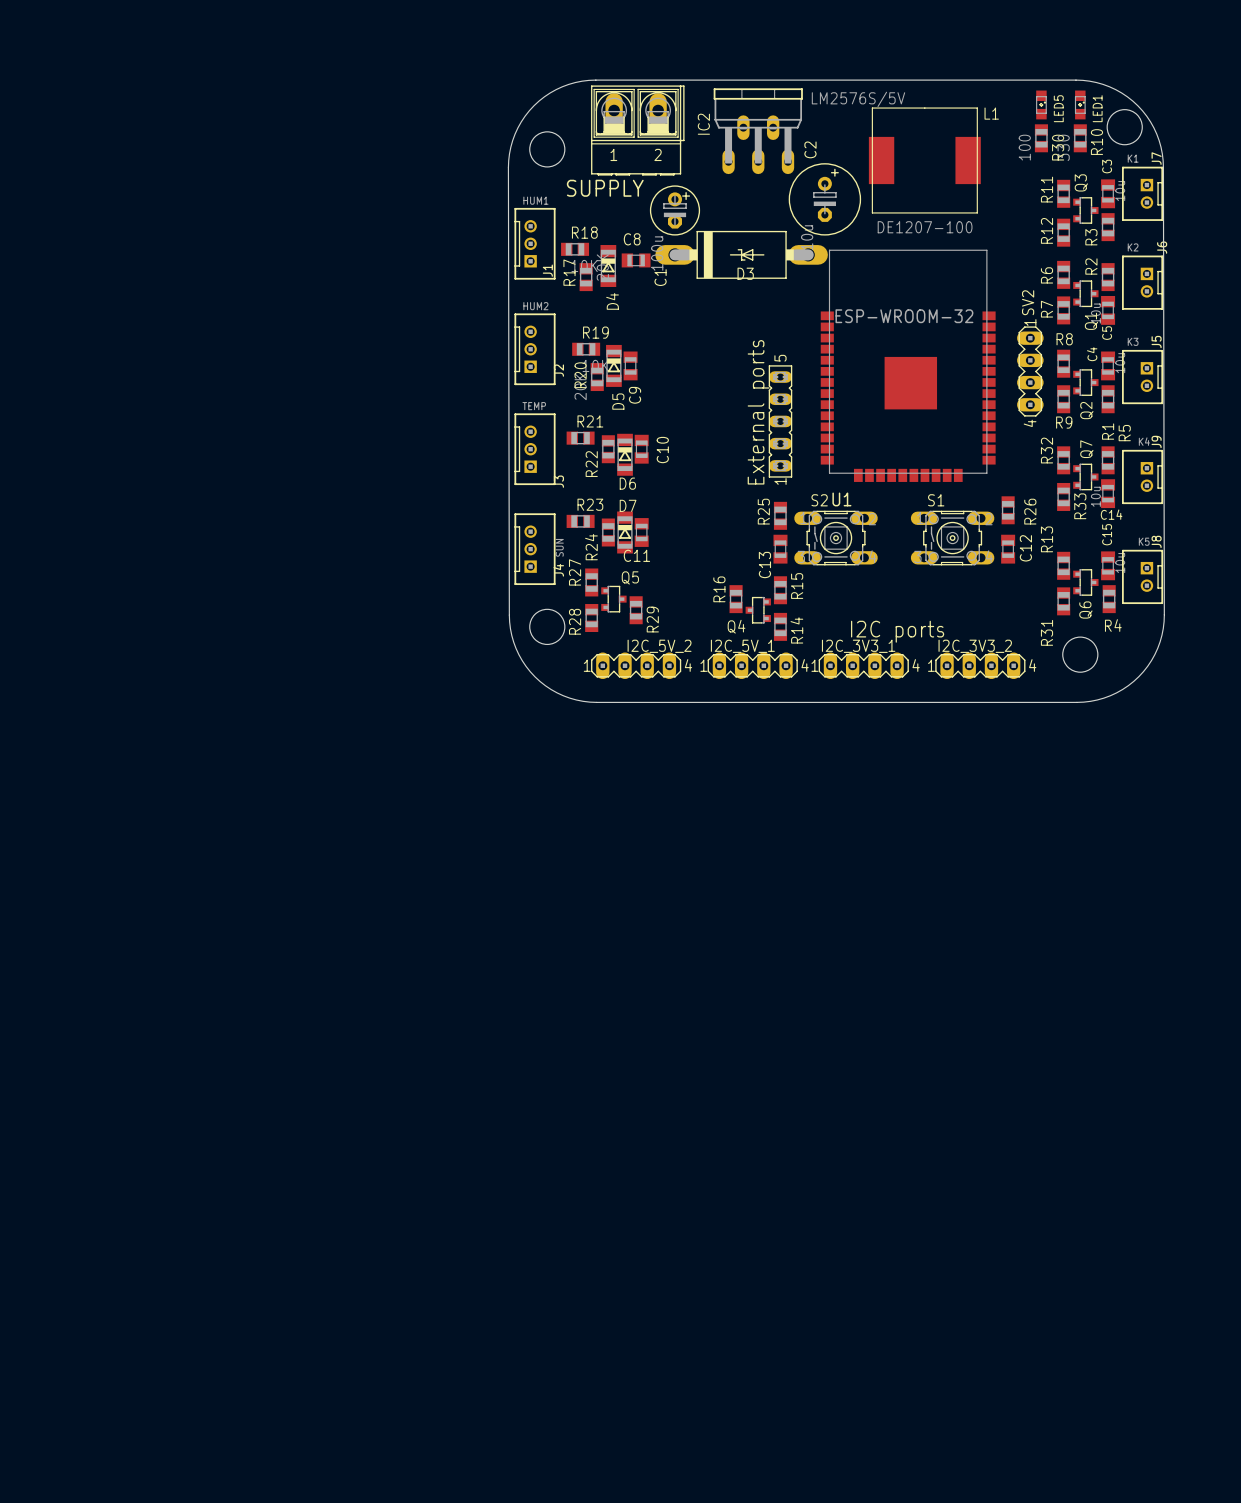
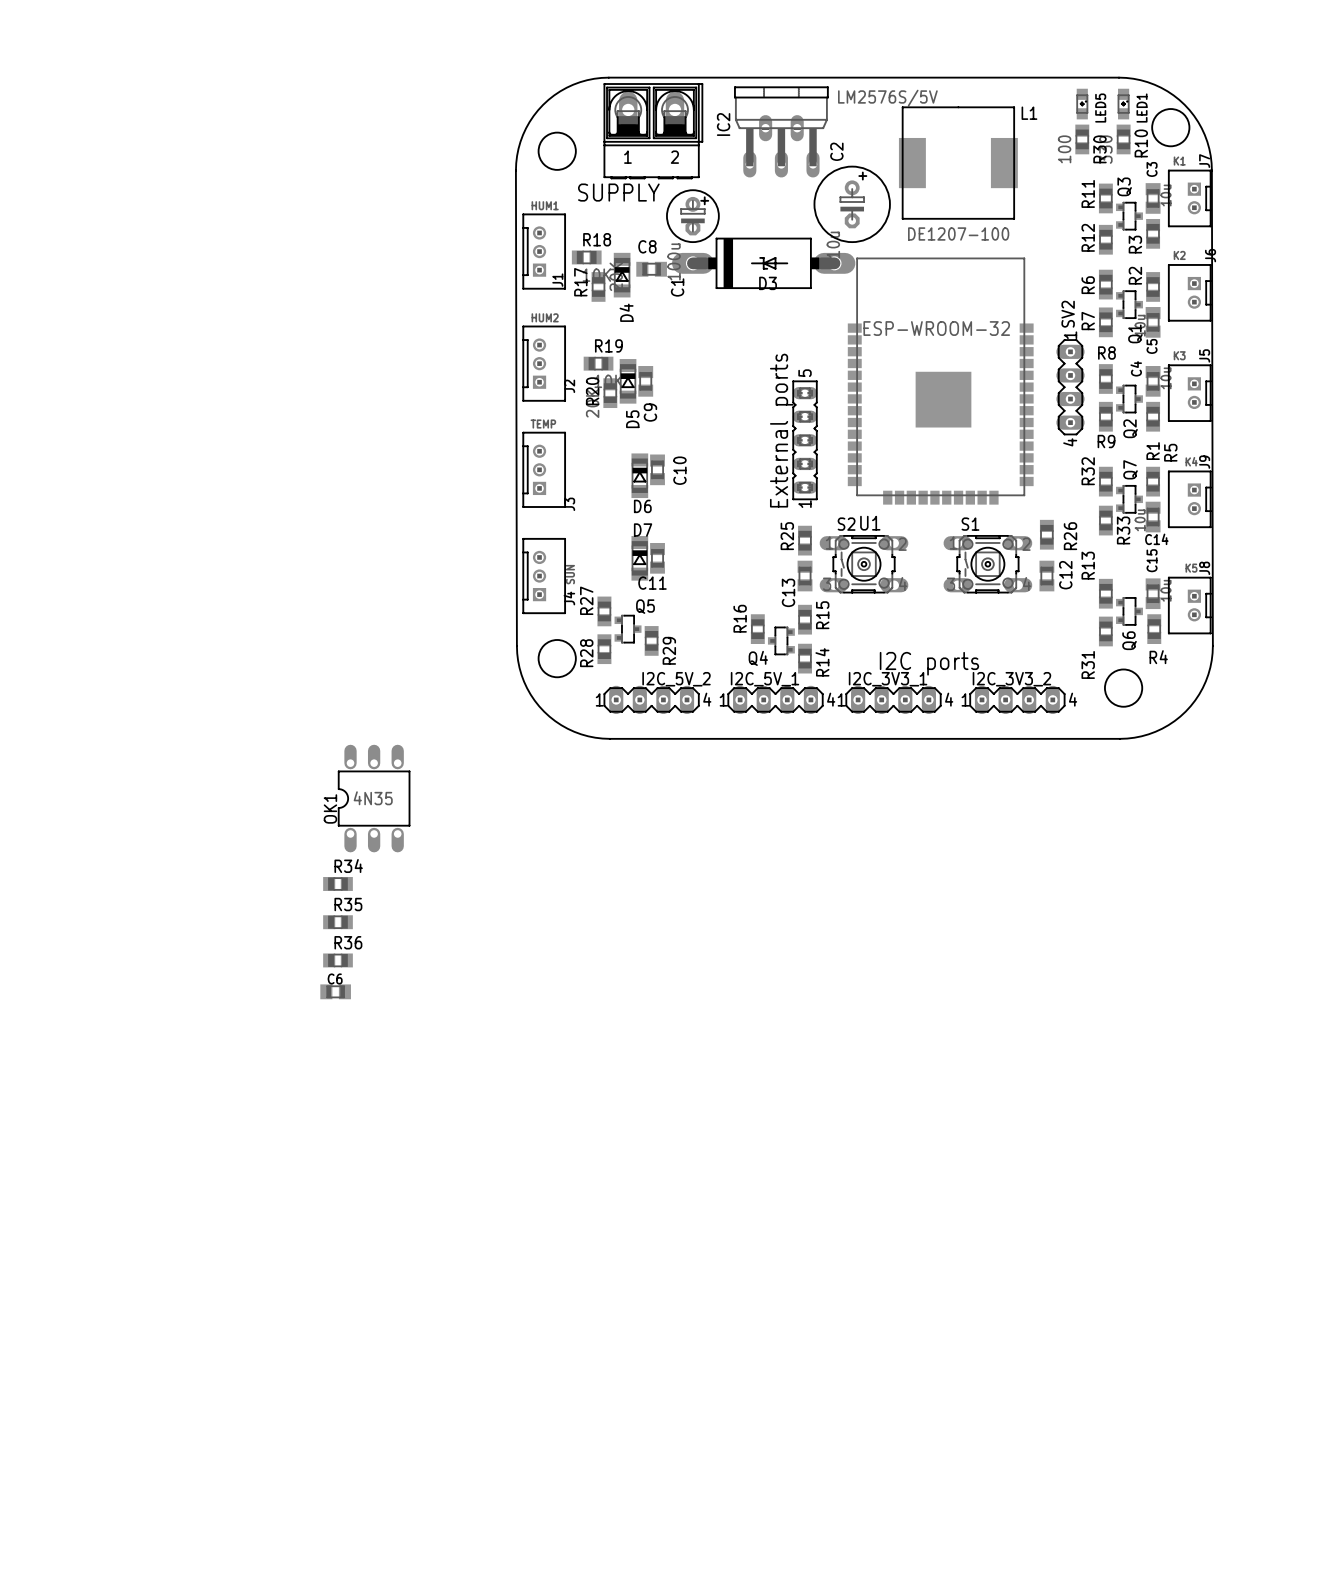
R21: (580, 438) -> none
R22: (608, 449) -> none
R23: (580, 521) -> none
R24: (608, 532) -> none
OK1: none -> 4N35 (374, 798)
R34: none -> (338, 883)
R35: none -> (338, 922)
R36: none -> (338, 960)
C6: none -> (335, 991)

